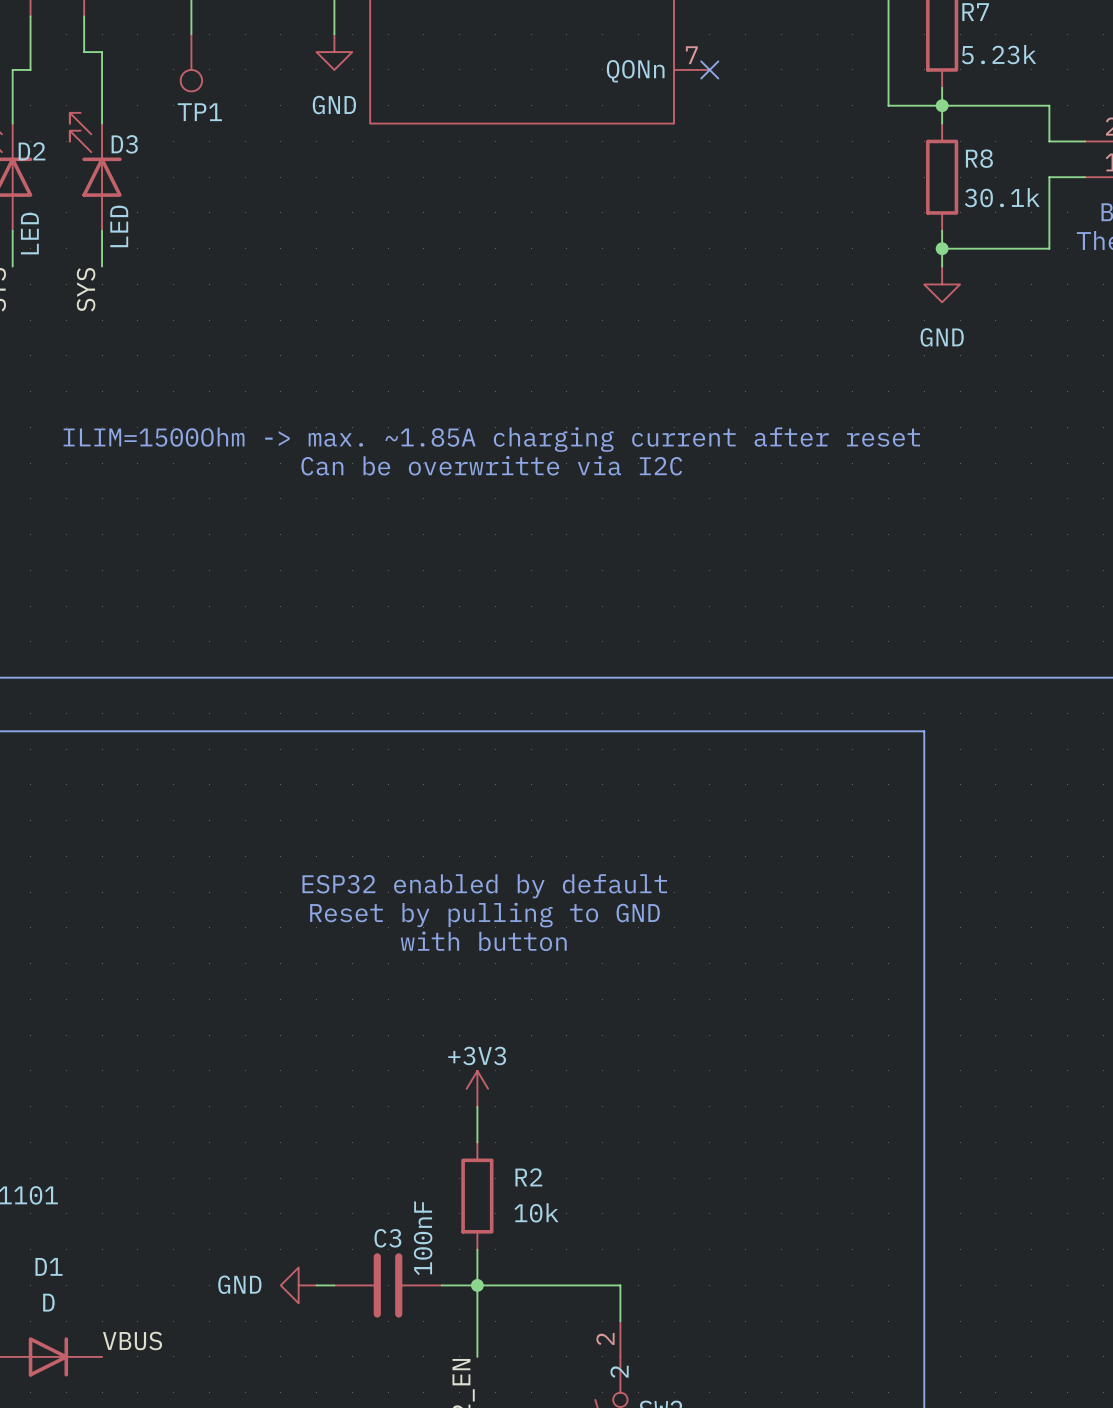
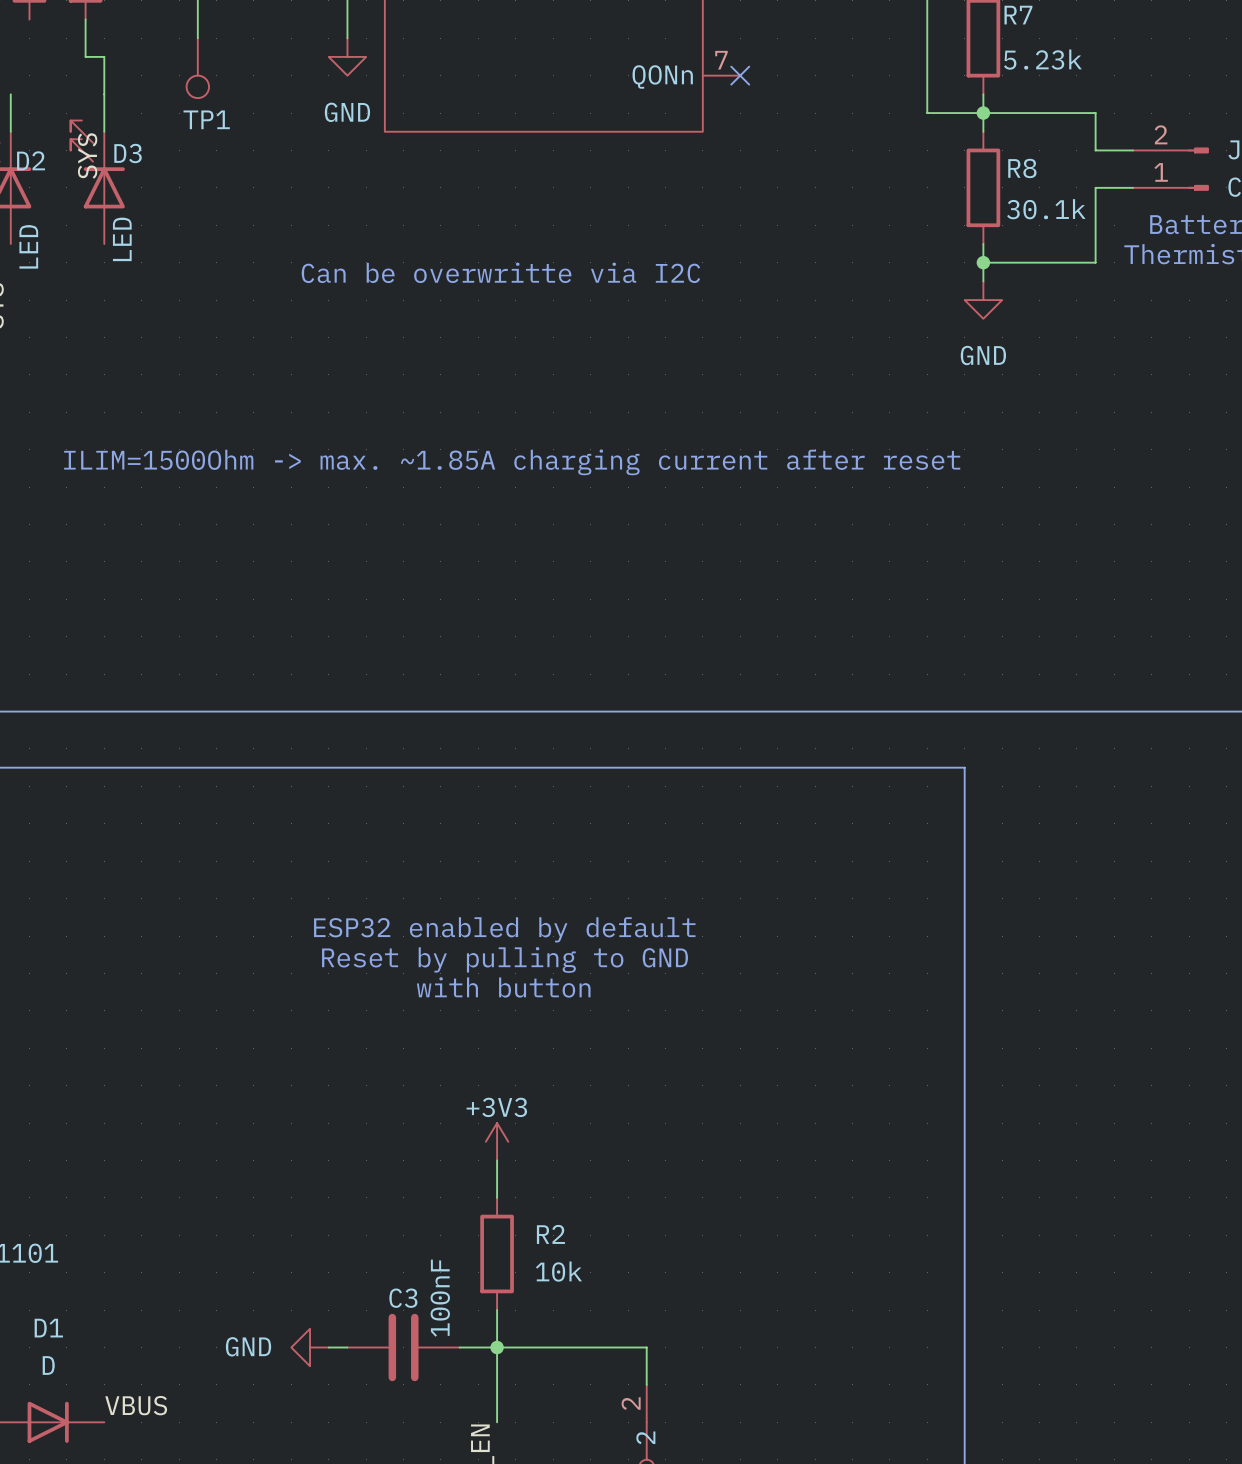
wire: (30, 16) (30, 69) (12, 69) (12, 87) -> none
wire: (12, 230) (12, 266) -> none
wire: (102, 230) (102, 266) -> none
label position: SYS (86, 289) -> SYS (87, 156)
text position: Can be overwritte via I2C (491, 465) -> Can be overwritte via I2C (500, 272)

